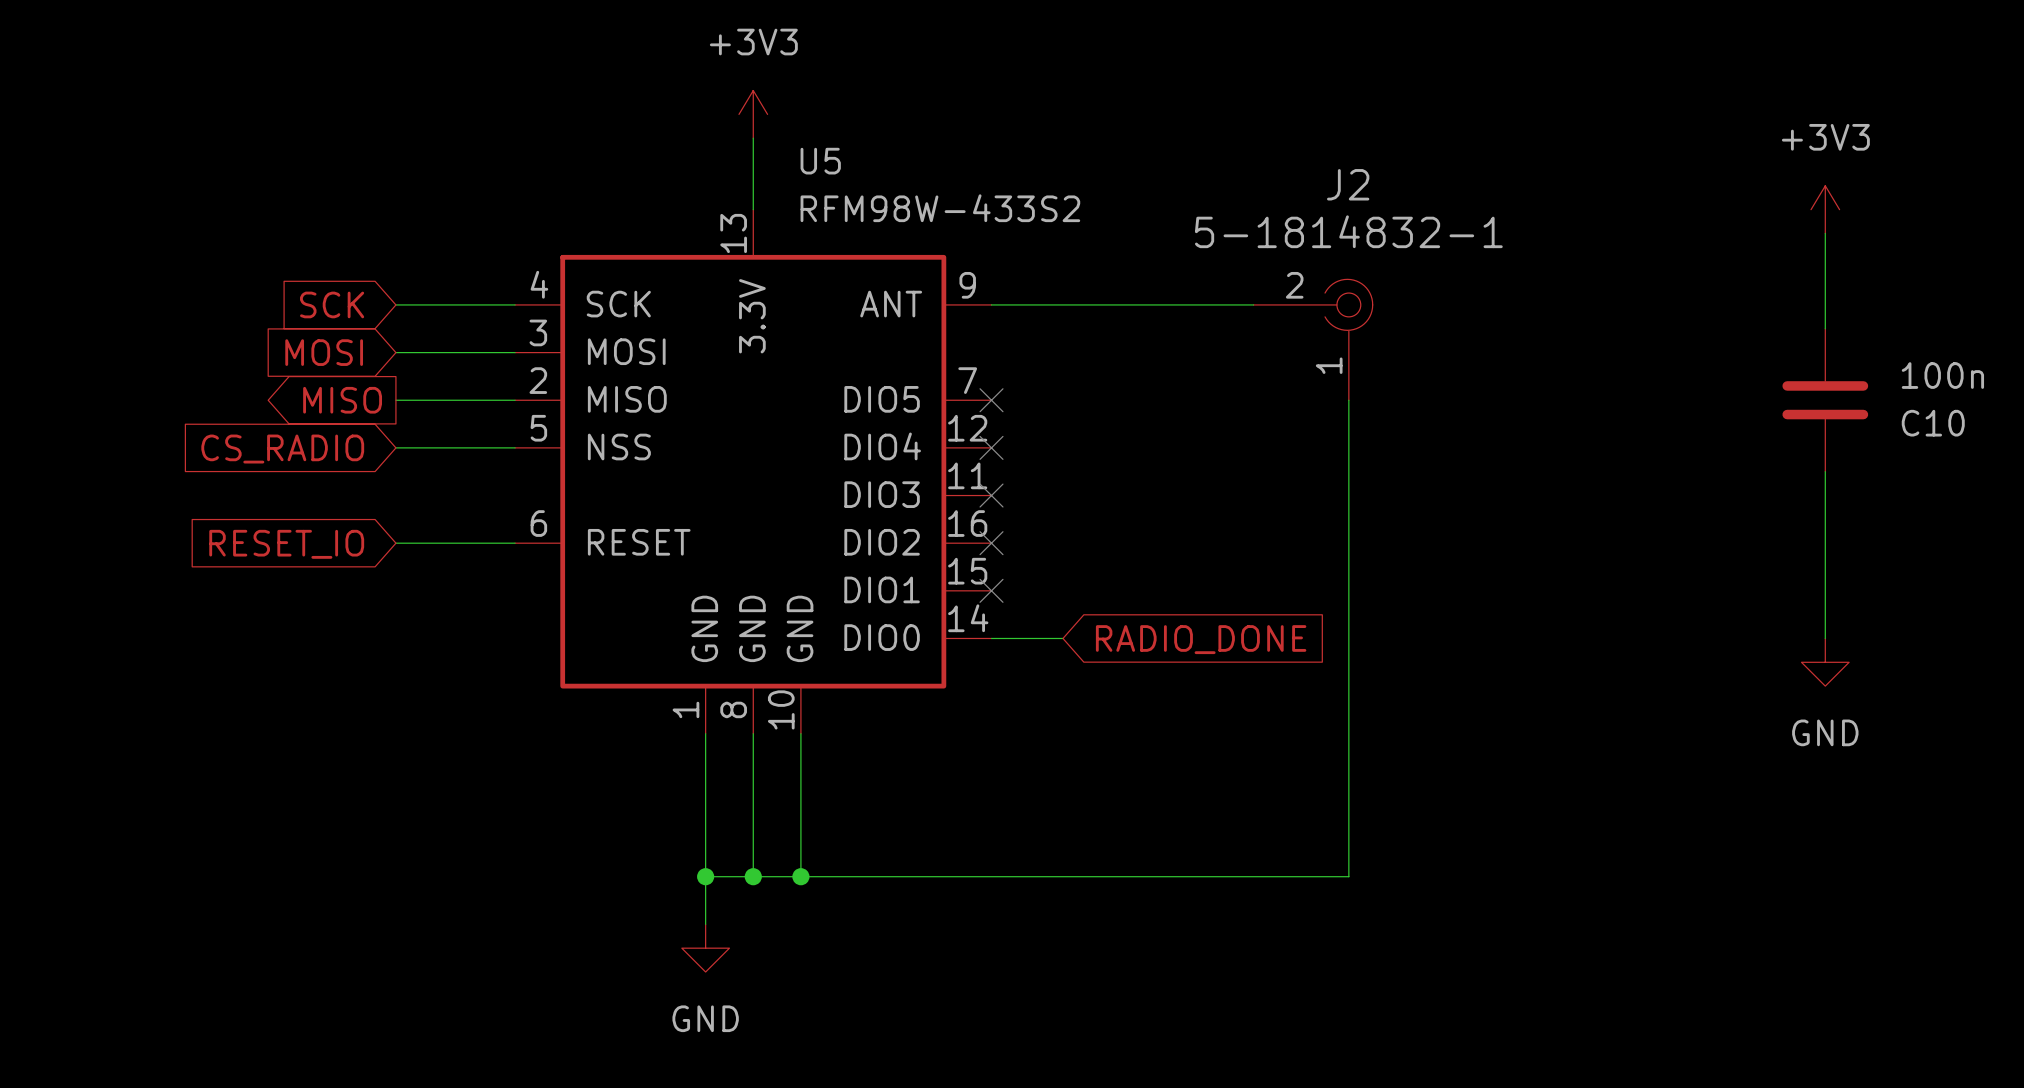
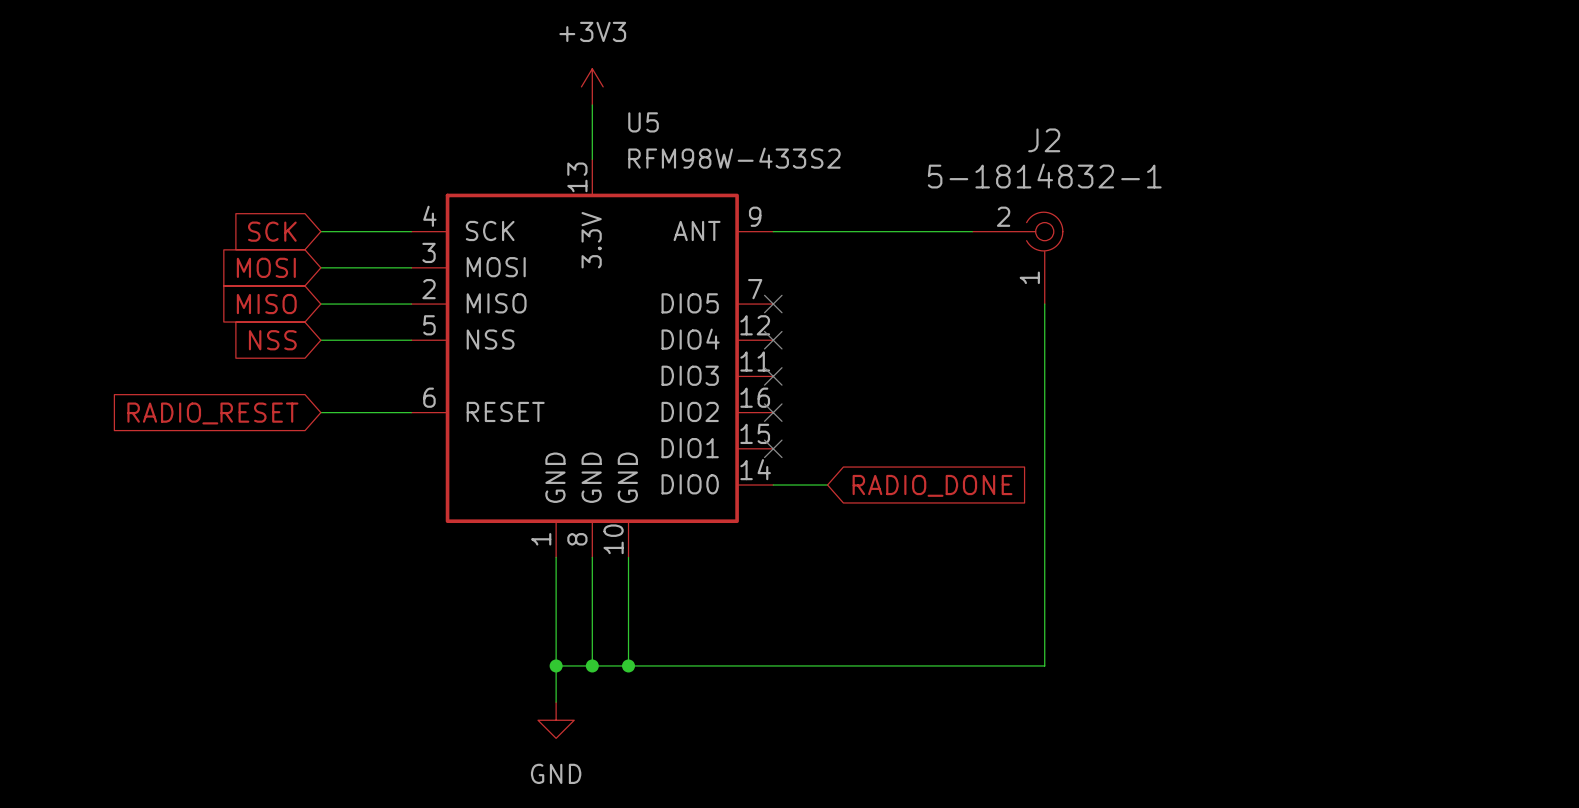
power symbol: +3V3 (1825, 209) -> none
wire: (1825, 233) (1825, 328) -> none
global label shape: output (342, 400) -> input (266, 304)
C10: 100n (1825, 400) -> none
global label: CS_RADIO (282, 449) -> NSS (272, 340)
wire: (1825, 471) (1825, 638) -> none
global label: RESET_IO (286, 544) -> RADIO_RESET (212, 413)
power symbol: GND (1825, 662) -> none

